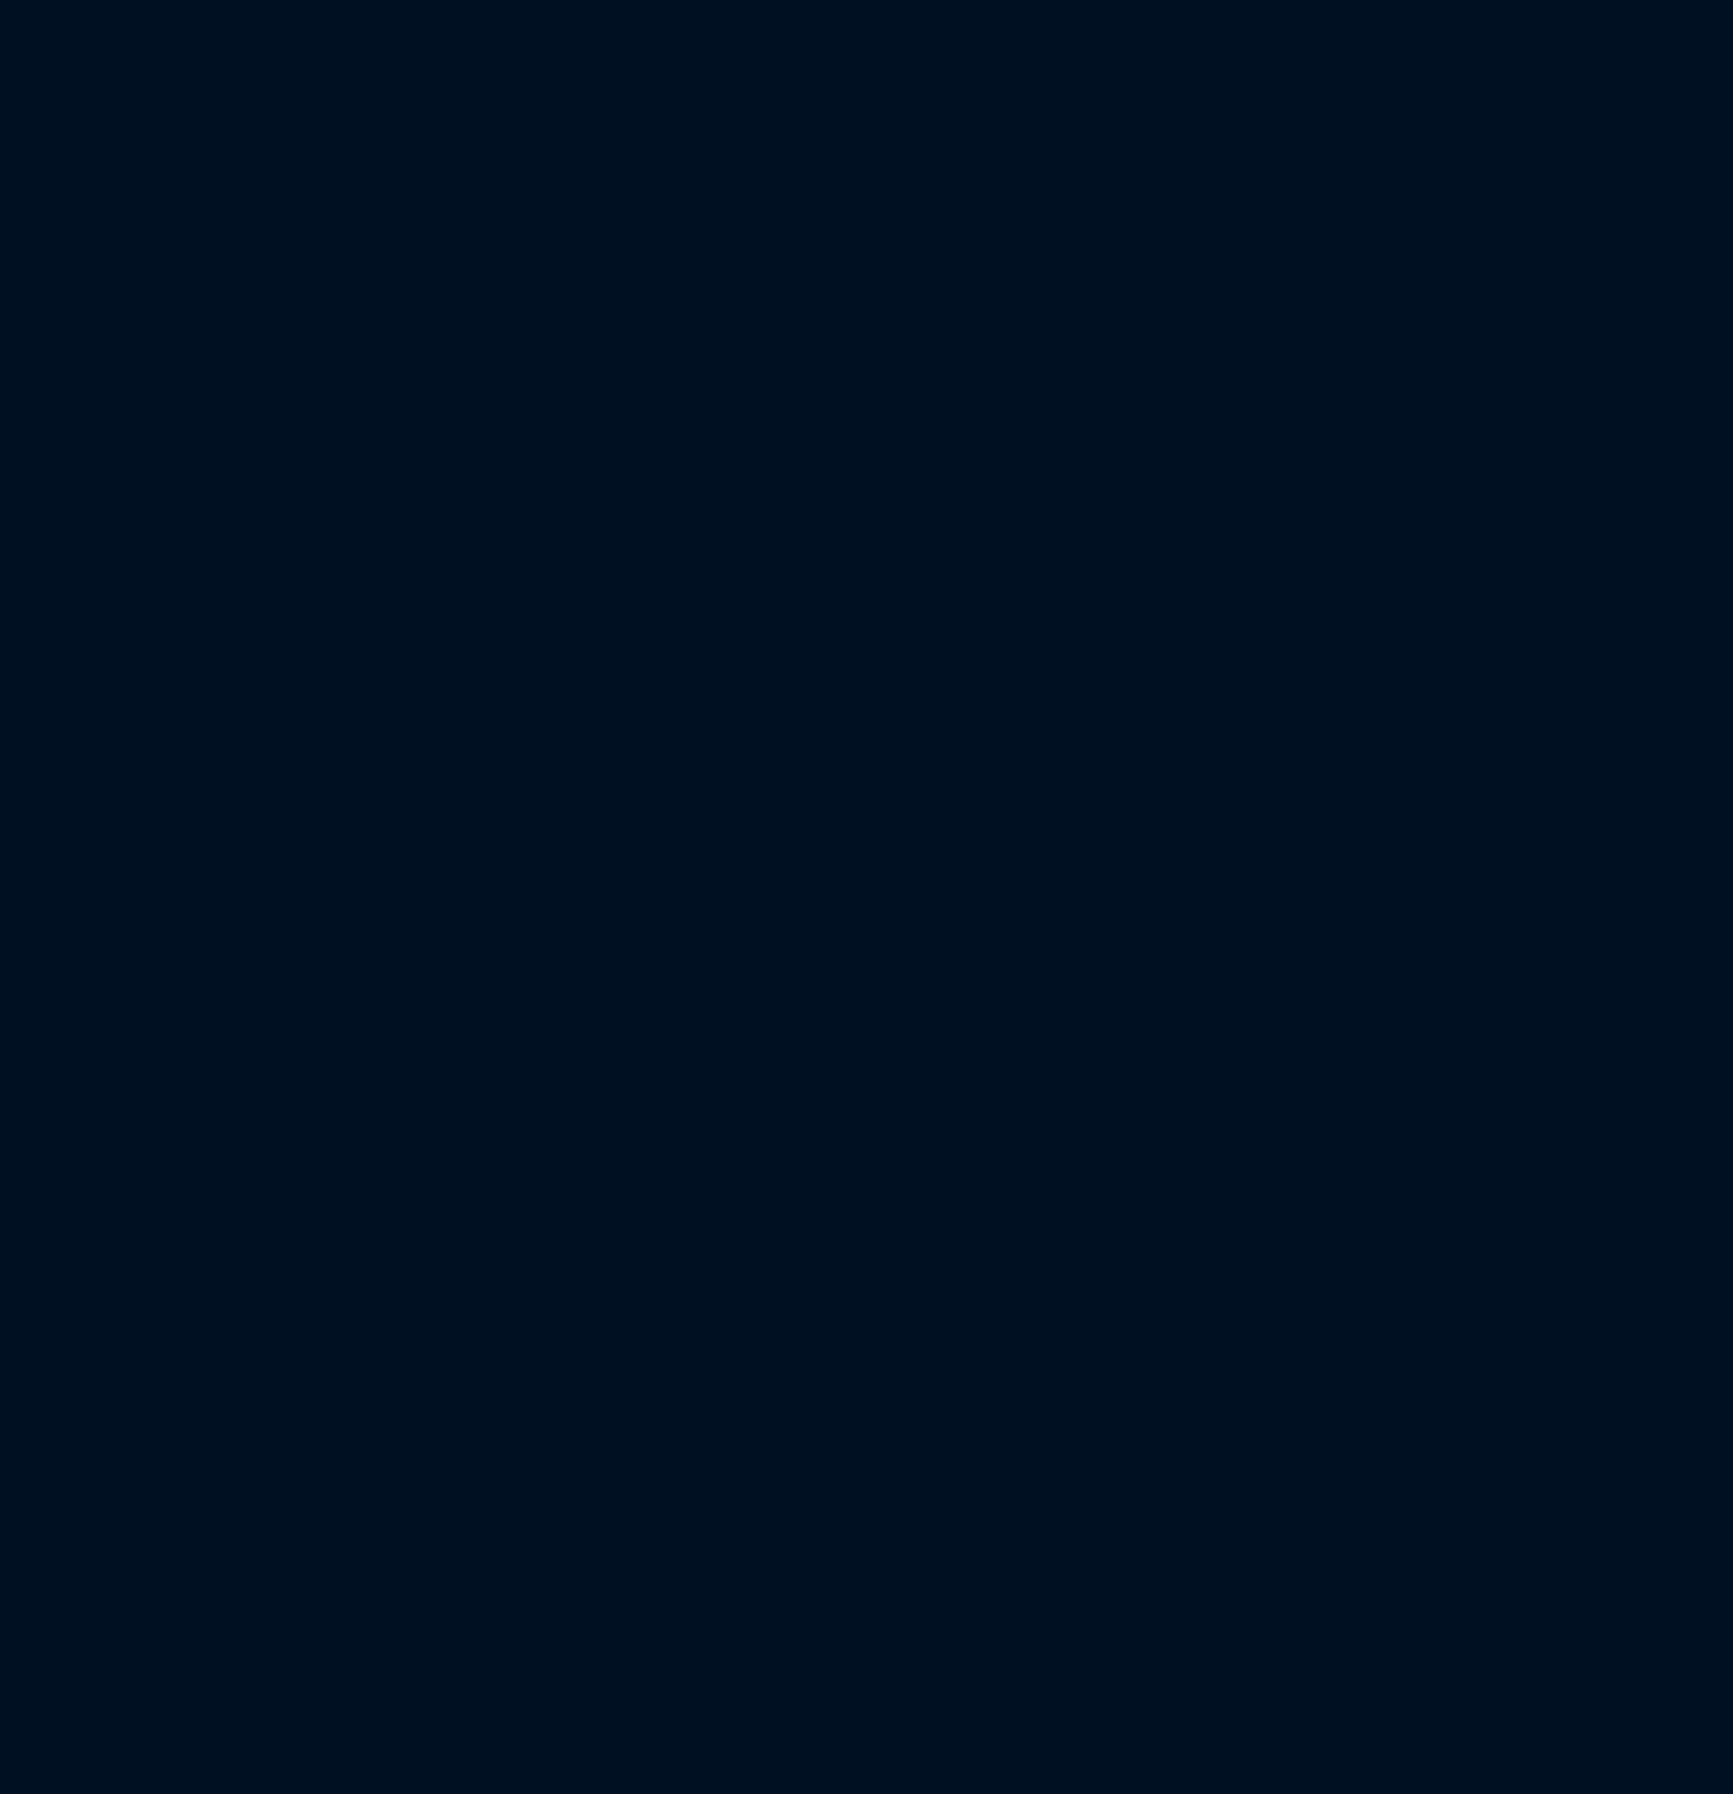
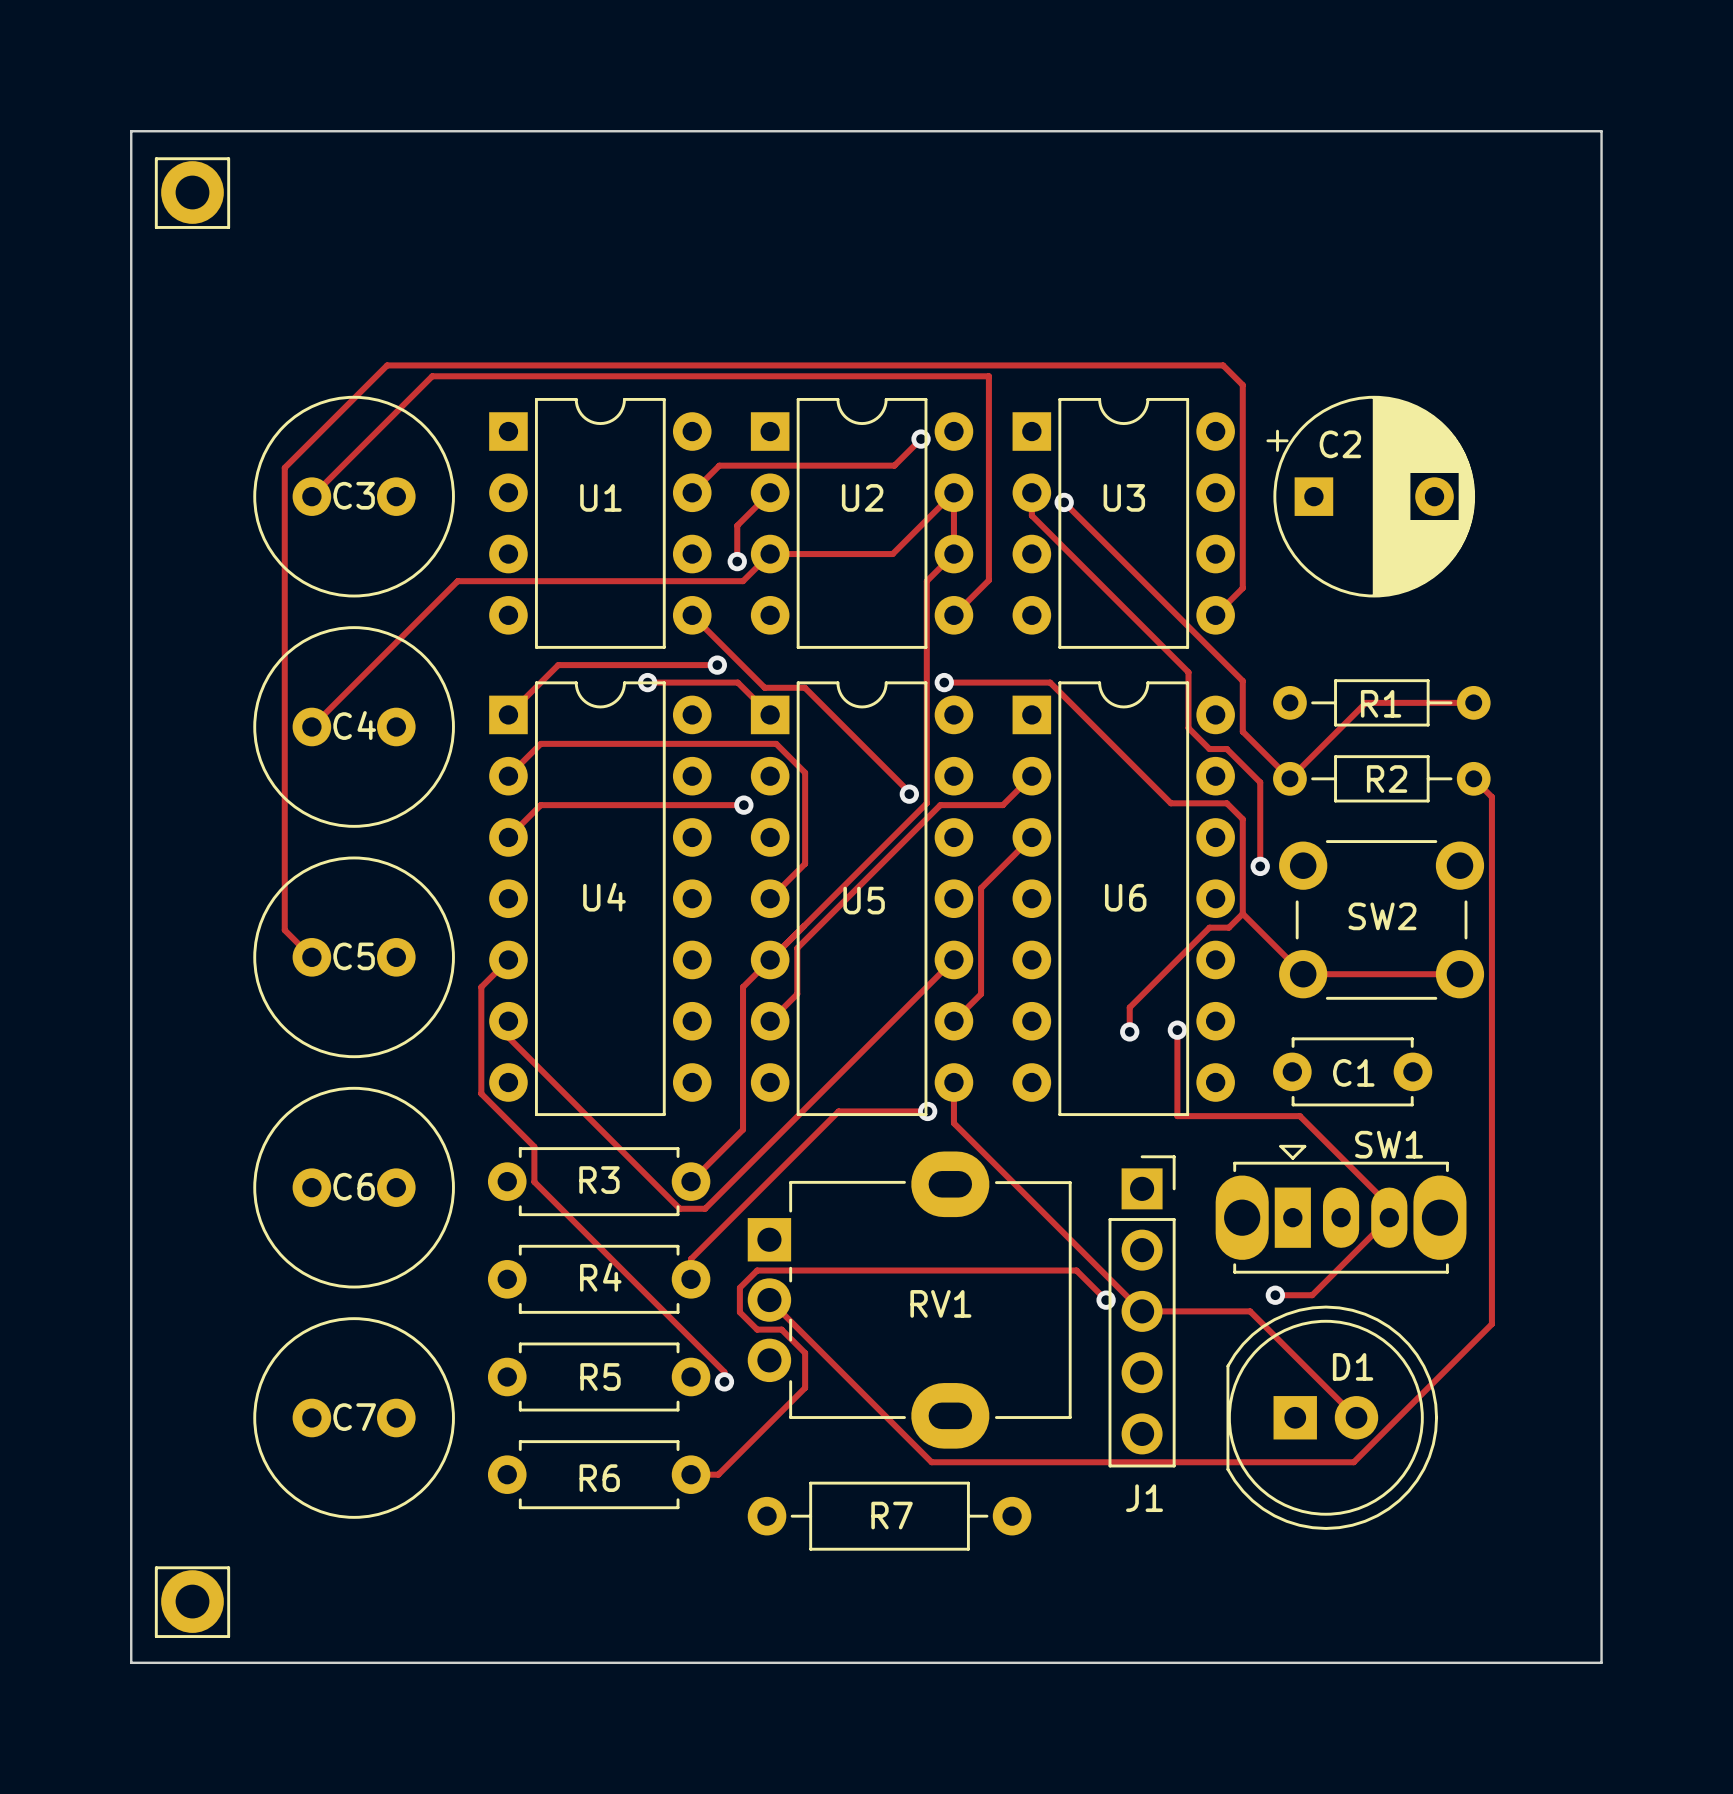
board edge: none -> (131, 131) (1601, 131) (1601, 1662) (131, 1662) (131, 131)
part: none -> (192, 193)
track: none -> (921, 439) (894, 465) (719, 465) (692, 492)
via: none -> (921, 439)
track: none -> (770, 492) (737, 525) (737, 561)
track: none -> (1031, 492) (1031, 515) (1188, 672) (1188, 728) (1209, 749) (1226, 749) (1260, 782) (1260, 866)
track: none -> (311, 496) (432, 376) (988, 376) (988, 580) (953, 615)
C3: none -> (354, 496)
C2: none -> (1370, 496)
track: none -> (1064, 502) (1242, 681) (1242, 731) (1289, 778) (1365, 702) (1473, 702)
via: none -> (1064, 502)
U1: none -> (600, 523)
U2: none -> (862, 523)
U3: none -> (1123, 523)
via: none -> (737, 561)
track: none -> (692, 615) (764, 687) (804, 687) (909, 794)
track: none -> (1215, 615) (1242, 588) (1242, 385) (1223, 365) (387, 365) (284, 467) (284, 930) (311, 957)
track: none -> (717, 665) (558, 665) (508, 714)
via: none -> (717, 665)
track: none -> (647, 682) (737, 682) (770, 714)
via: none -> (647, 682)
track: none -> (944, 682) (1050, 682) (1170, 803) (1226, 803) (1242, 819) (1242, 913)
via: none -> (944, 682)
R1: none -> (1381, 702)
track: none -> (311, 726) (457, 581) (743, 581) (770, 554) (892, 554) (953, 492) (953, 554) (926, 581) (926, 803) (743, 987) (743, 1129) (691, 1181)
C4: none -> (354, 726)
track: none -> (508, 776) (540, 743) (776, 743) (805, 772) (805, 863) (770, 898)
track: none -> (1031, 776) (1002, 805) (940, 805) (797, 948) (797, 994) (770, 1021)
R2: none -> (1381, 778)
track: none -> (1473, 778) (1491, 797) (1491, 1324) (1353, 1462) (931, 1462) (769, 1300)
via: none -> (909, 794)
track: none -> (743, 805) (540, 805) (508, 837)
via: none -> (743, 805)
track: none -> (1031, 837) (981, 888) (981, 994) (953, 1021)
via: none -> (1260, 866)
U4: none -> (600, 898)
U5: none -> (862, 898)
U6: none -> (1123, 898)
track: none -> (1242, 913) (1228, 927) (1209, 927) (1129, 1007) (1129, 1031)
track: none -> (1242, 913) (1303, 974) (1459, 974)
SW2: none -> (1381, 919)
C5: none -> (354, 957)
track: none -> (508, 959) (481, 987) (481, 1093) (534, 1146) (534, 1181) (724, 1372) (724, 1381)
track: none -> (953, 959) (705, 1208) (679, 1208) (508, 1037) (508, 1021)
track: none -> (1177, 1030) (1177, 1116) (1299, 1116) (1389, 1205) (1389, 1218) (1312, 1295) (1275, 1295)
via: none -> (1177, 1030)
via: none -> (1129, 1031)
C1: none -> (1352, 1071)
track: none -> (953, 1082) (953, 1123) (1142, 1311) (1250, 1311) (1356, 1417)
track: none -> (927, 1111) (838, 1111) (691, 1259) (691, 1279)
via: none -> (927, 1111)
R3: none -> (599, 1181)
C6: none -> (354, 1187)
SW1: none -> (1341, 1209)
R4: none -> (599, 1279)
via: none -> (1275, 1295)
RV1: none -> (909, 1300)
track: none -> (1106, 1300) (1076, 1270) (757, 1270) (739, 1287) (739, 1312) (757, 1329) (781, 1329) (805, 1353) (805, 1387) (718, 1474) (691, 1474)
via: none -> (1106, 1300)
J1: none -> (1142, 1311)
R5: none -> (599, 1377)
via: none -> (724, 1381)
D1: none -> (1332, 1417)
C7: none -> (354, 1418)
R6: none -> (599, 1474)
R7: none -> (889, 1516)
part: none -> (192, 1602)

